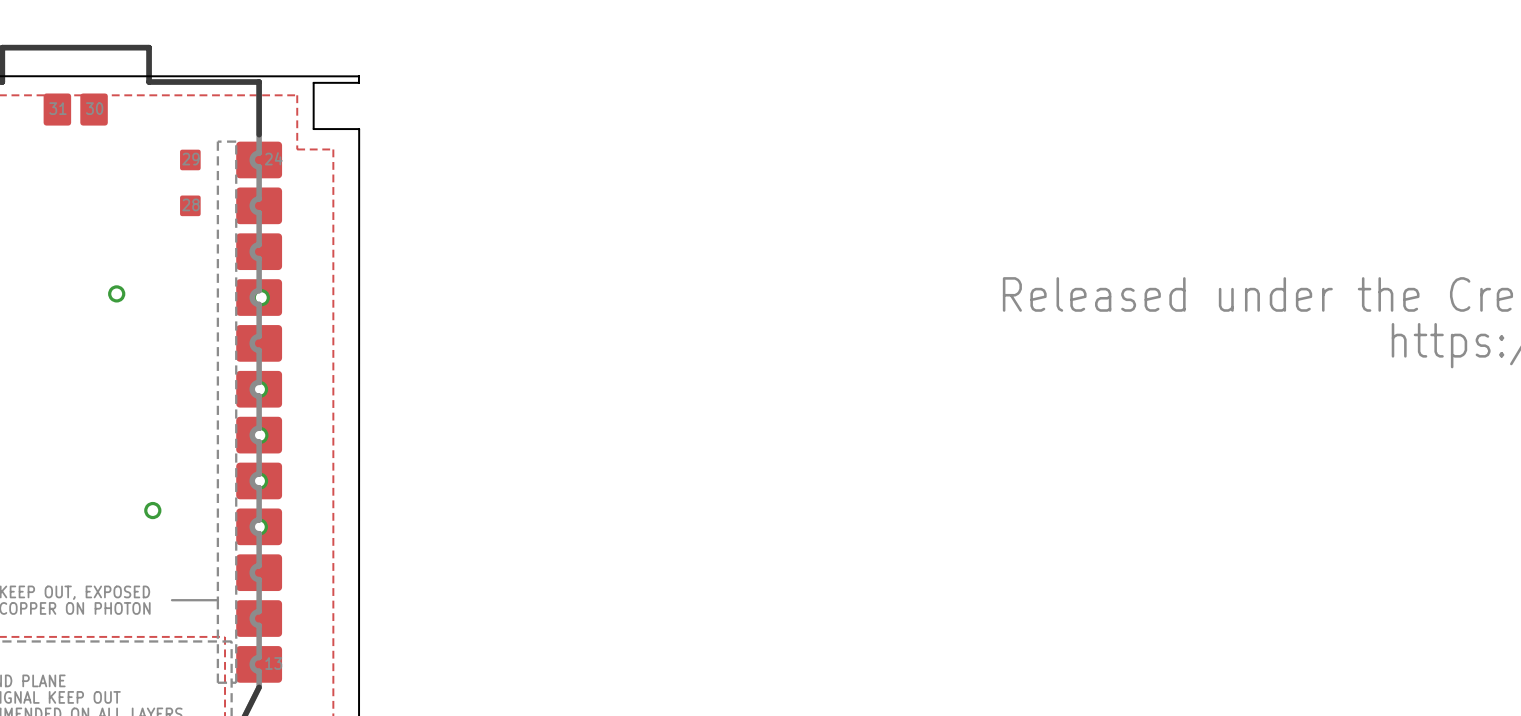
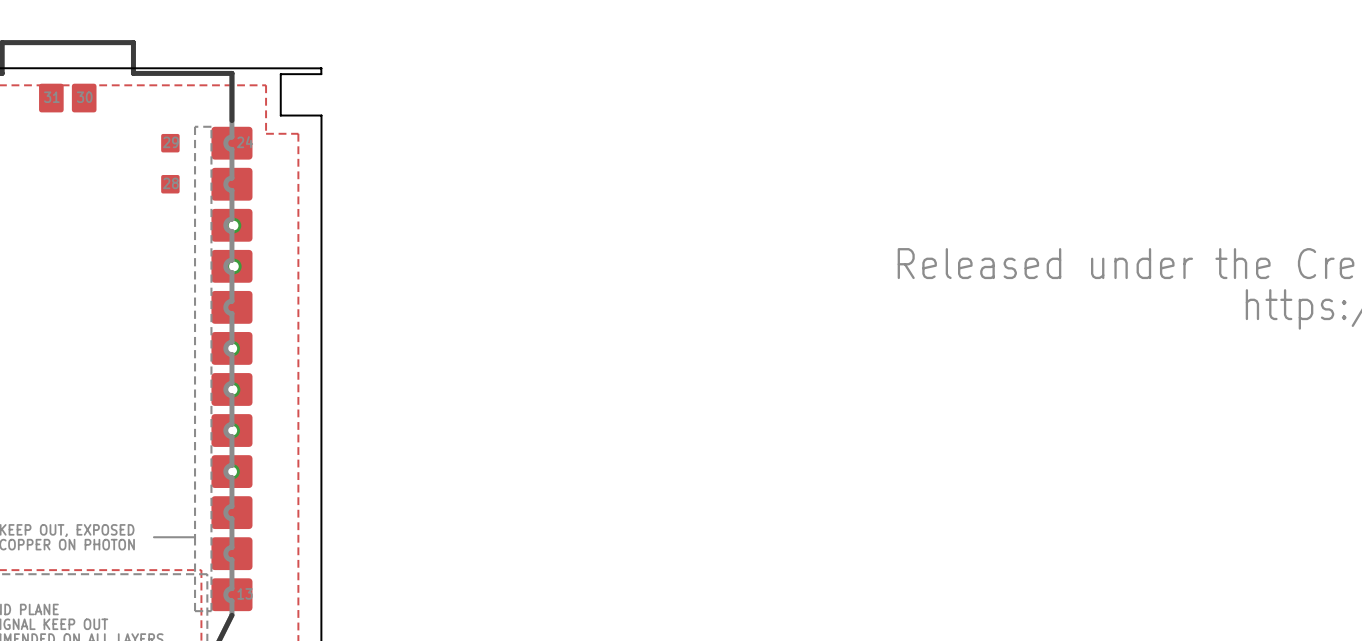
via: none -> (233, 225)
via: (116, 293) -> none
via: (152, 510) -> none

